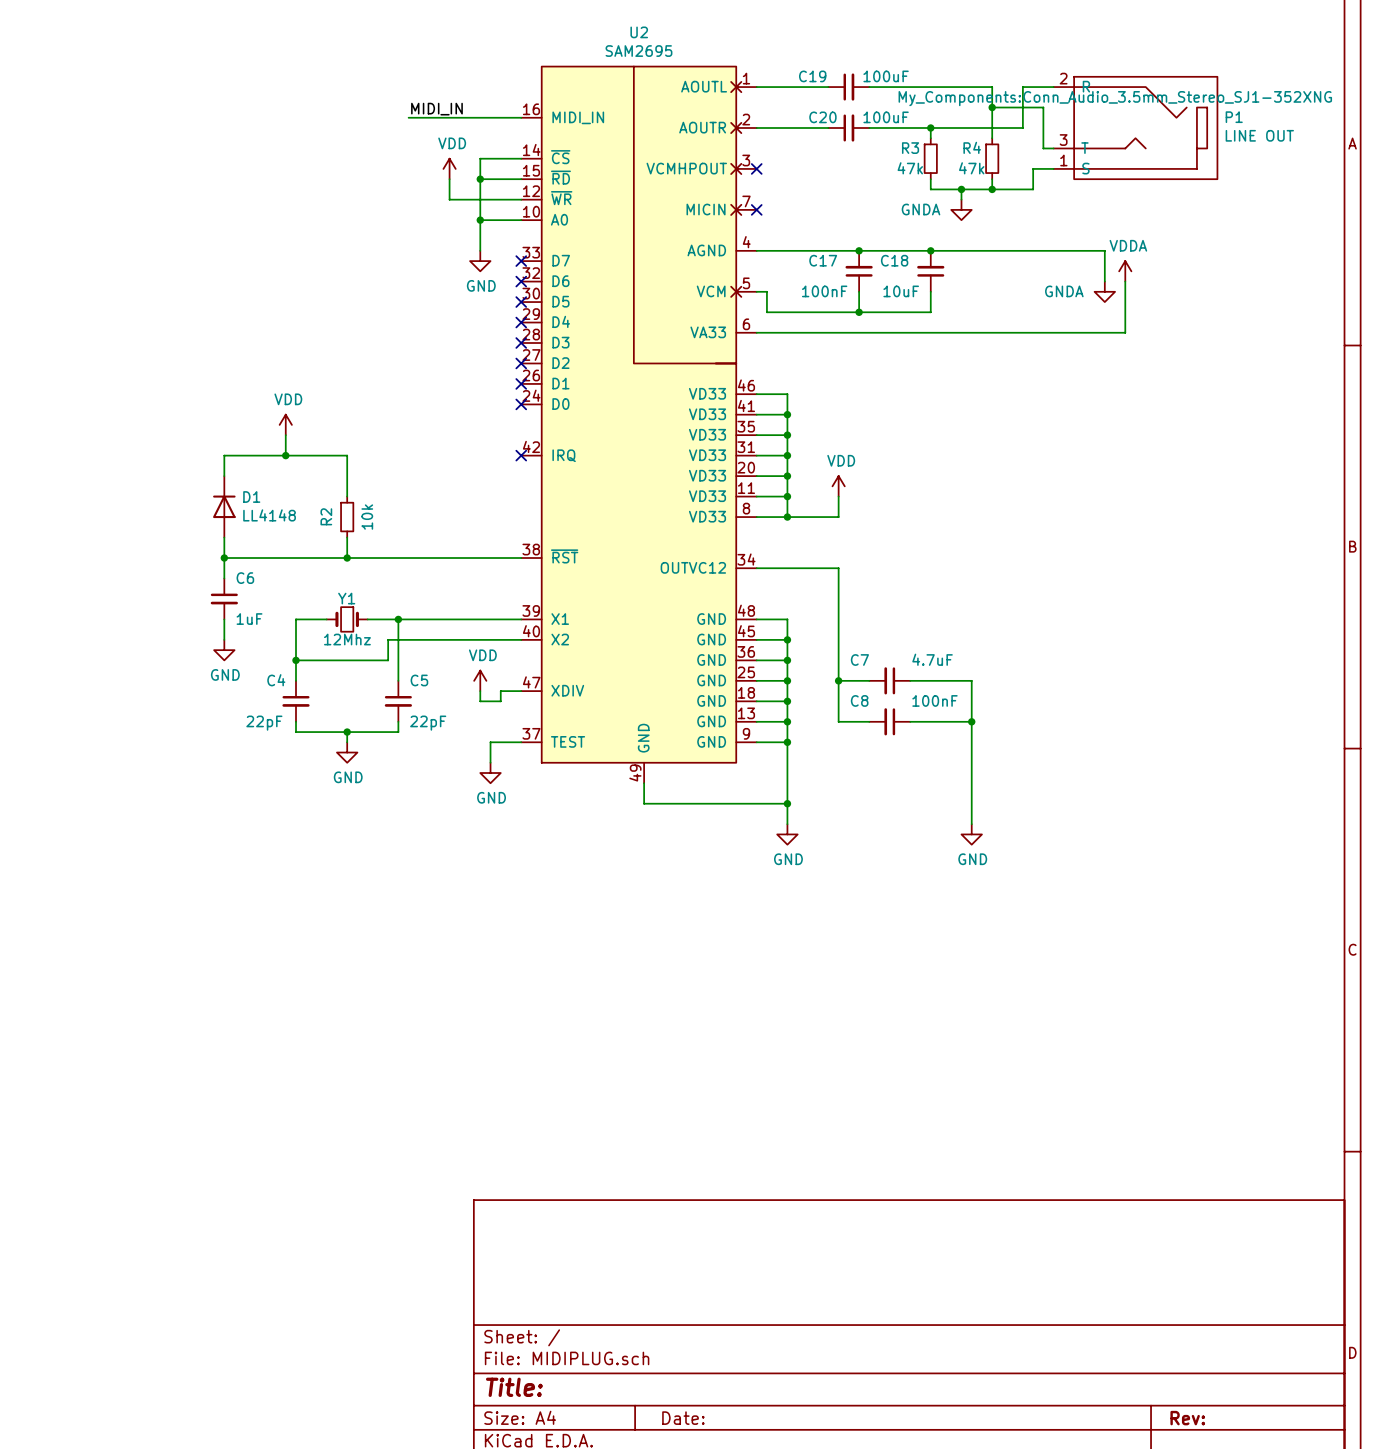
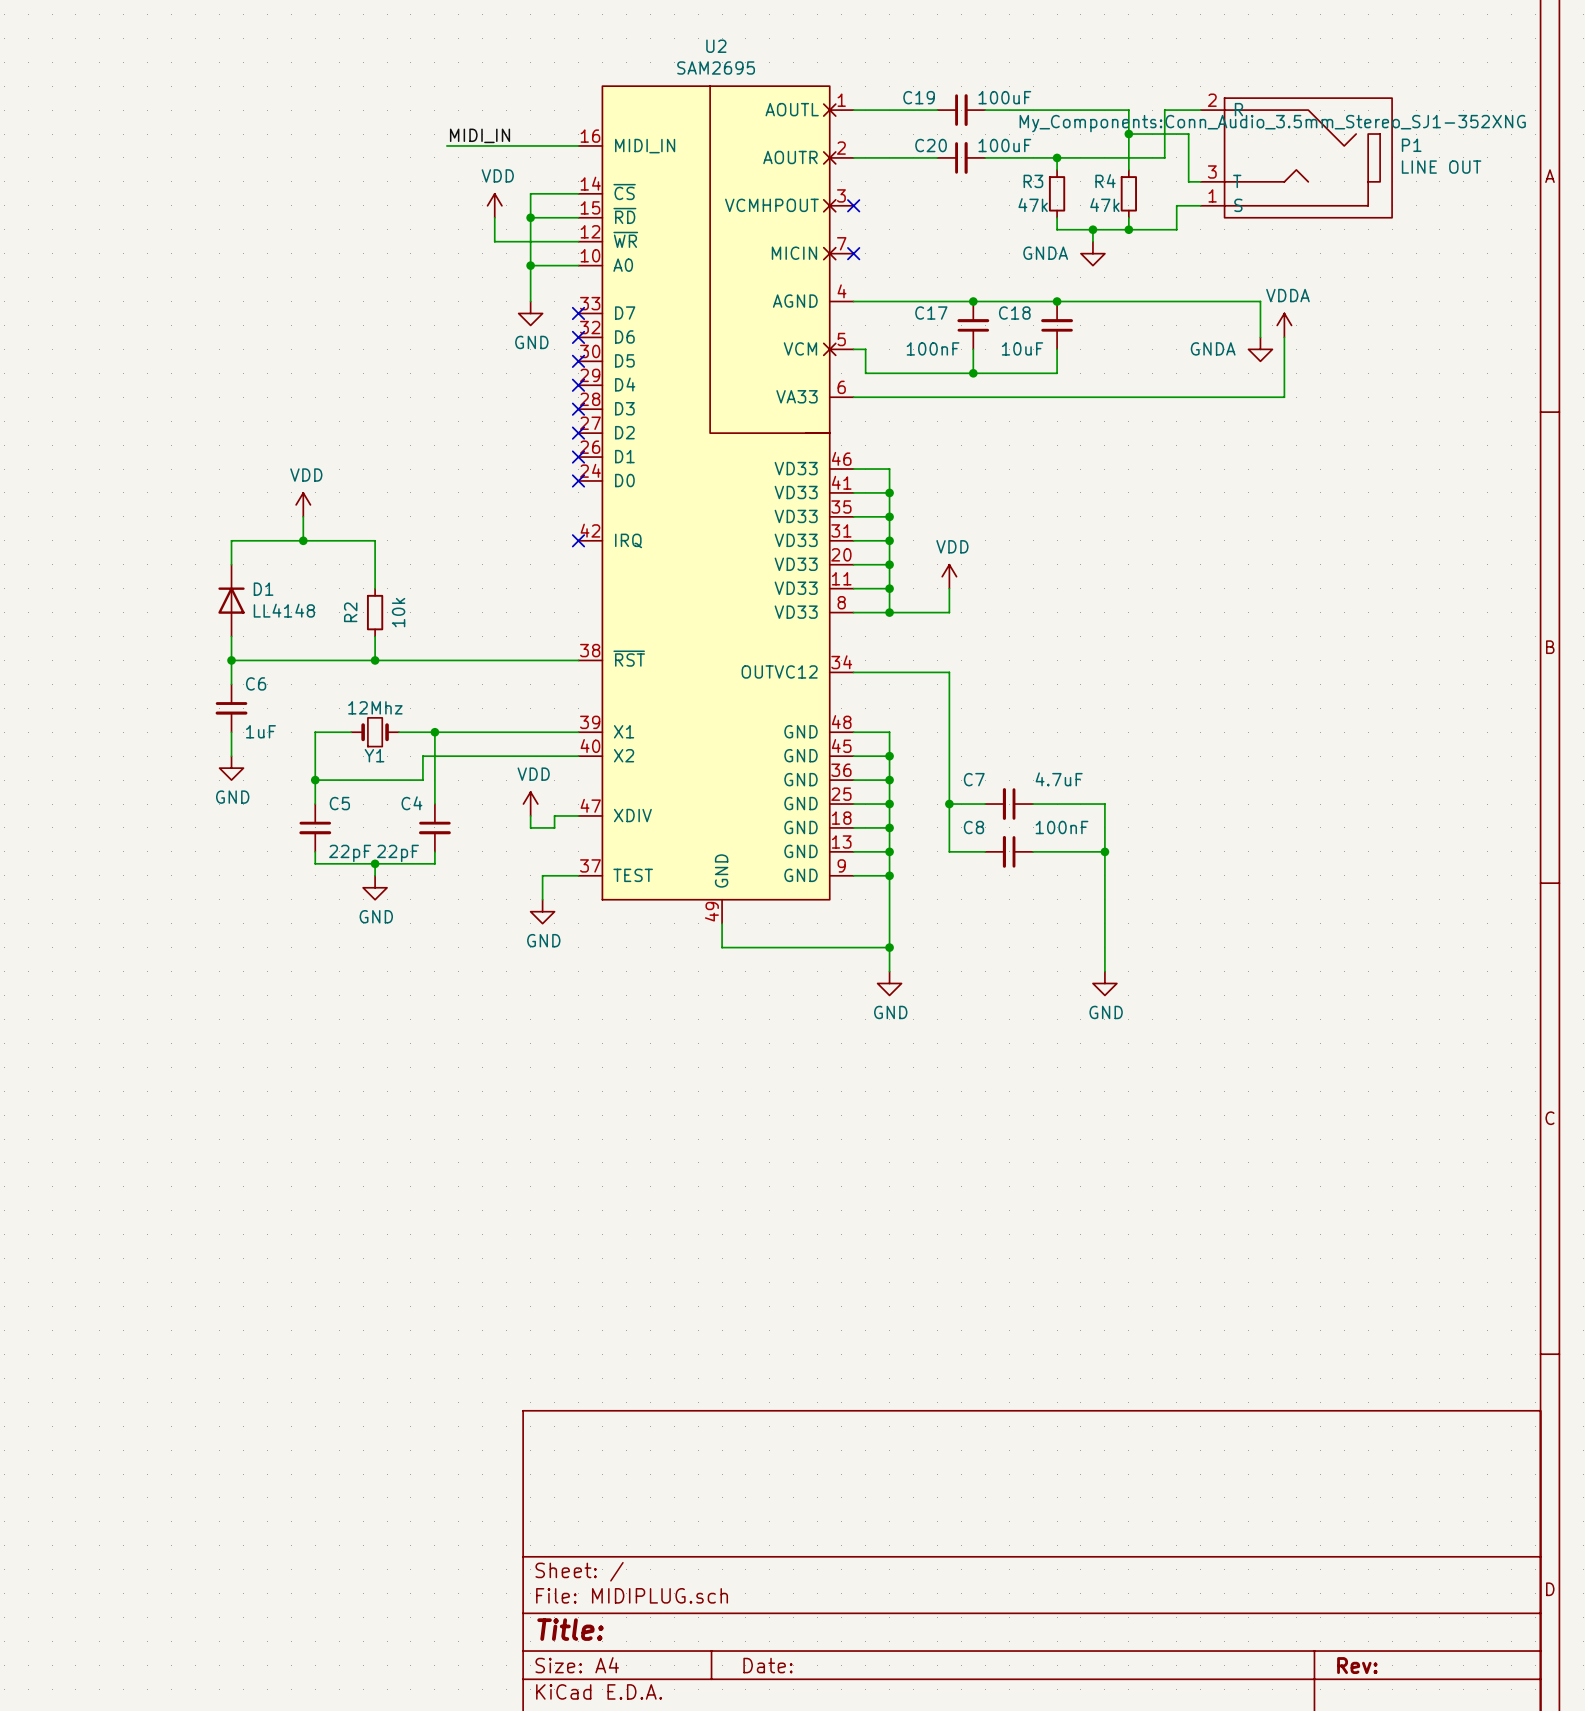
Y1 name position: Y1 (346, 598) -> Y1 (374, 755)
Y1 value position: 12Mhz (347, 639) -> 12Mhz (375, 707)
C4 name: C4 (276, 680) -> C5 (339, 803)
C5 name: C5 (419, 680) -> C4 (411, 803)
C4 value position: 22pF (264, 723) -> 22pF (350, 853)
C5 value position: 22pF (428, 723) -> 22pF (397, 853)

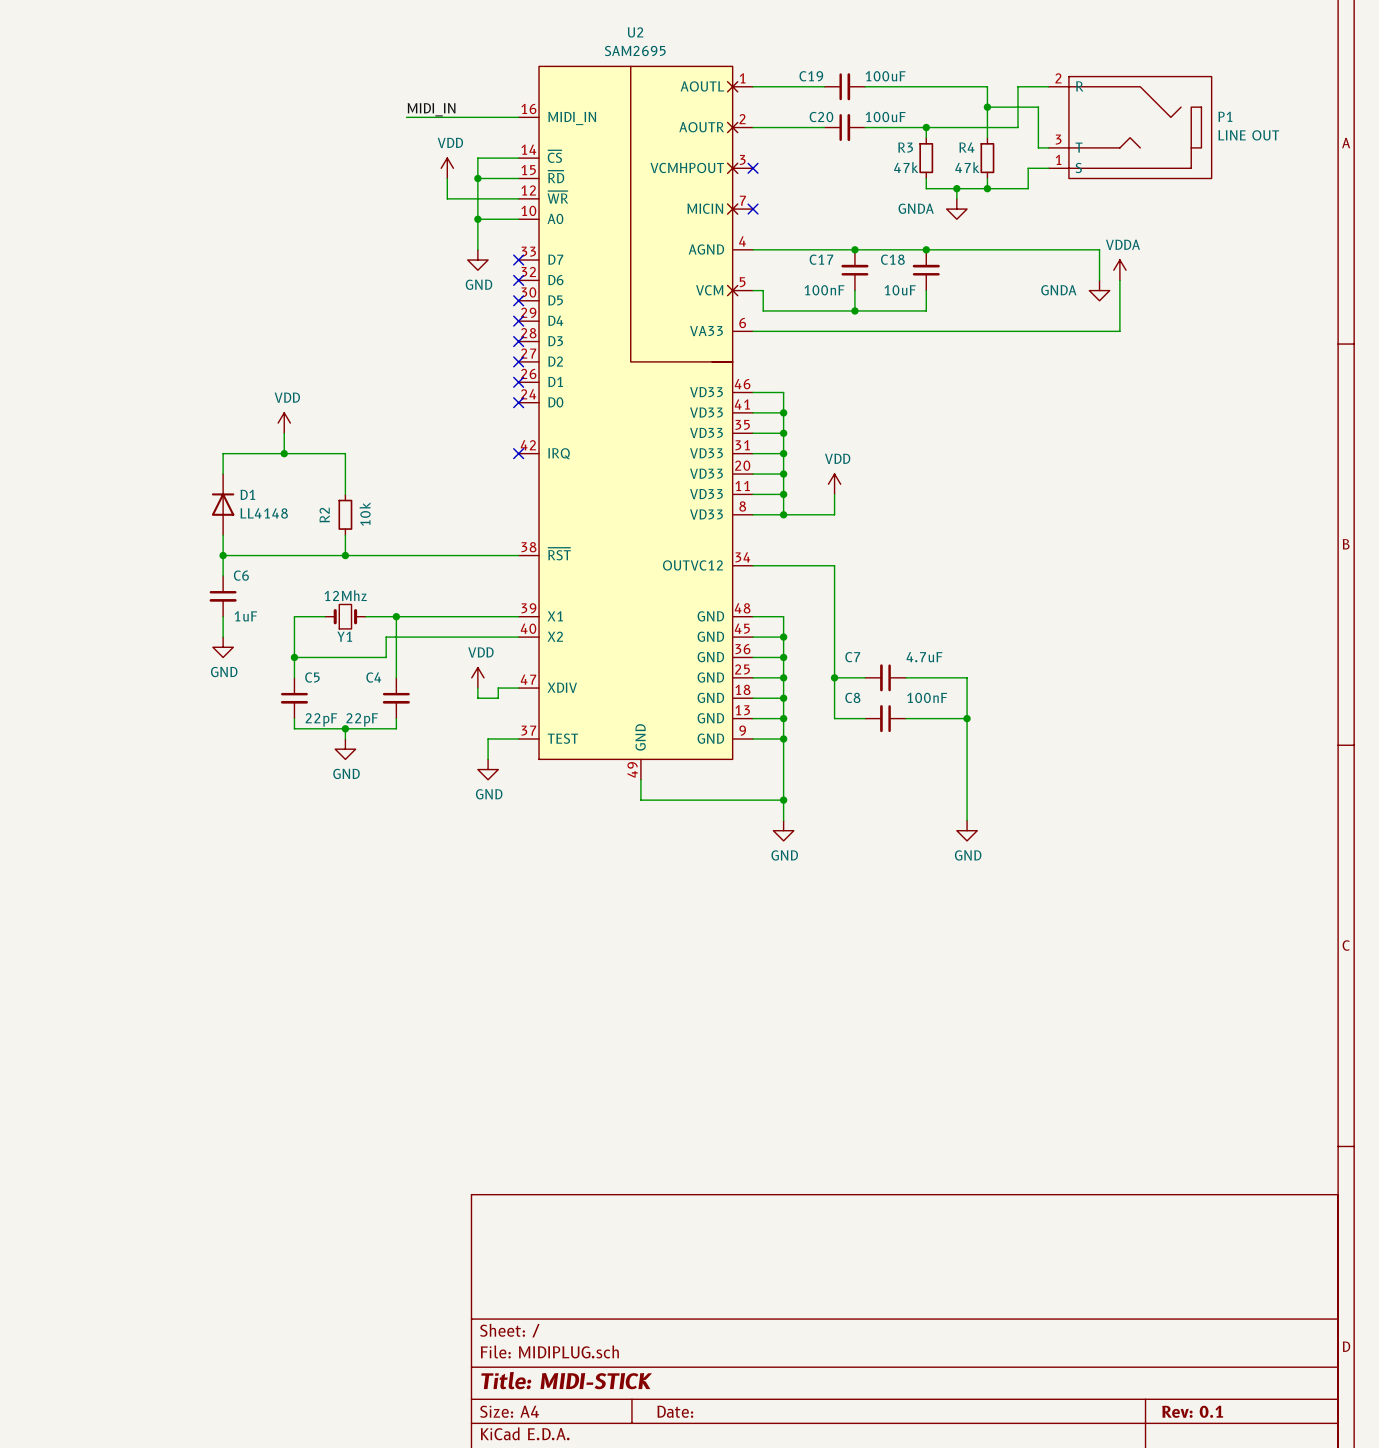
P1 text: My_Components:Conn_Audio_3.5mm_Stereo_SJ1-352XNG (1272, 123) -> none
title block: Title: (570, 1629) -> Title: MIDI-STICK (566, 1380)
title block: Rev: (1357, 1665) -> Rev: 0.1 (1192, 1411)

